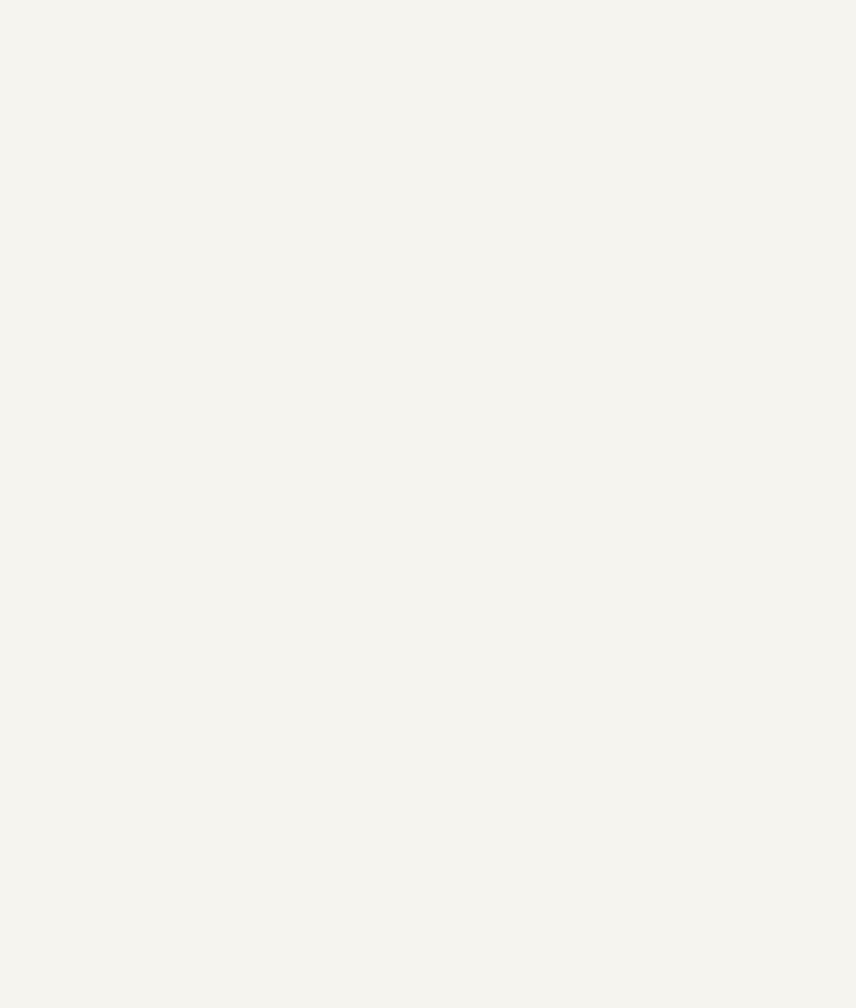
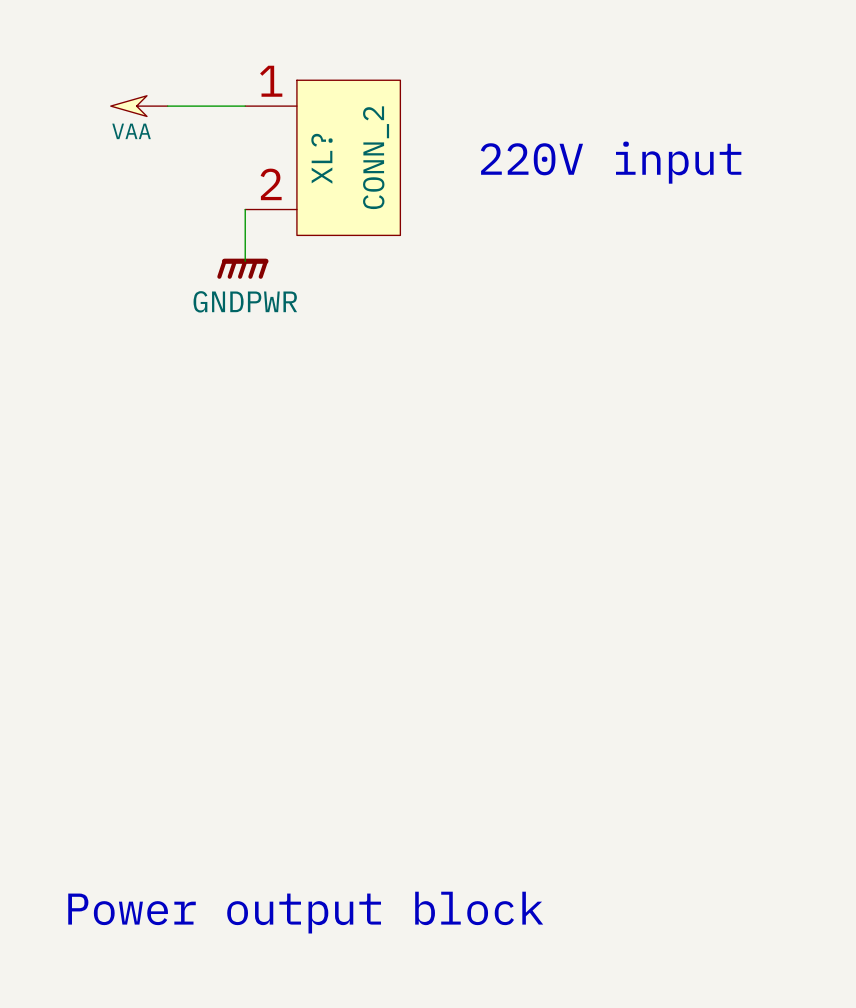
power symbol: none -> VAA (139, 106)
wire: none -> (167, 106) (245, 106)
XL?: none -> CONN_2 (322, 157)
text: none -> 220V input (611, 162)
wire: none -> (245, 209) (245, 261)
power symbol: none -> GNDPWR (242, 268)
text: none -> Power output block (305, 912)

